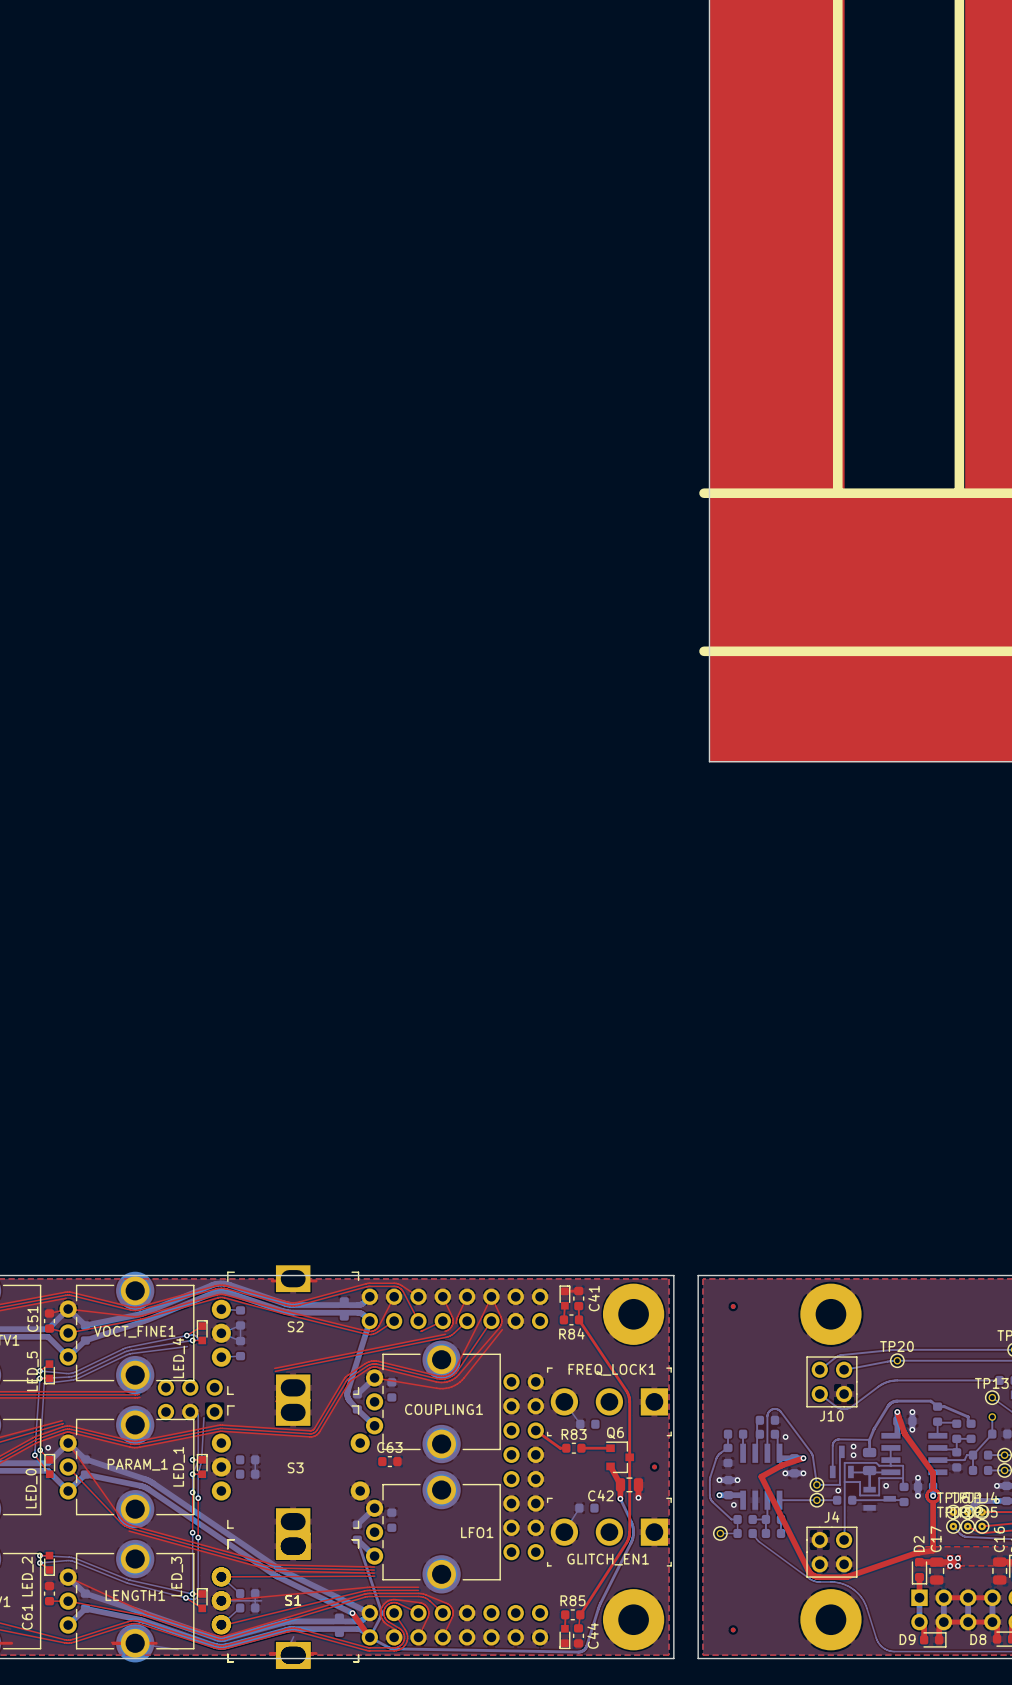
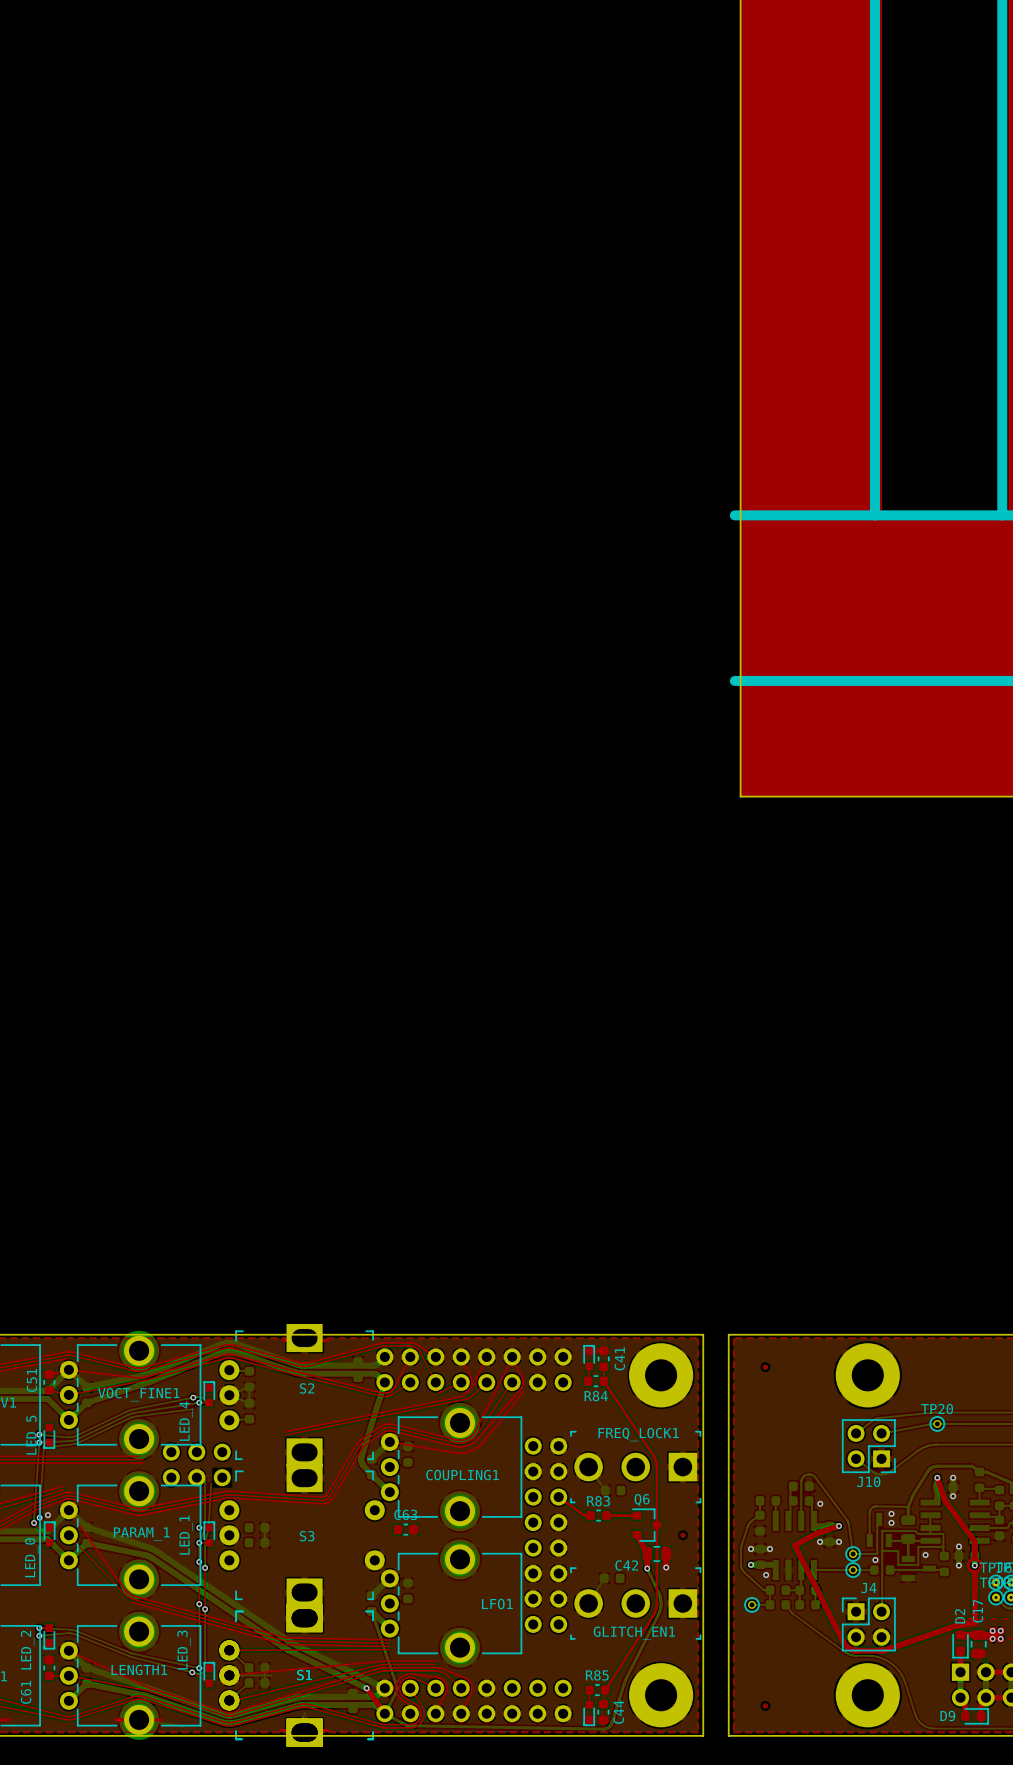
J10 footprint: [806, 1356, 858, 1408] -> [842, 1419, 896, 1473]
J4 footprint: [806, 1526, 858, 1578] -> [842, 1597, 896, 1652]

